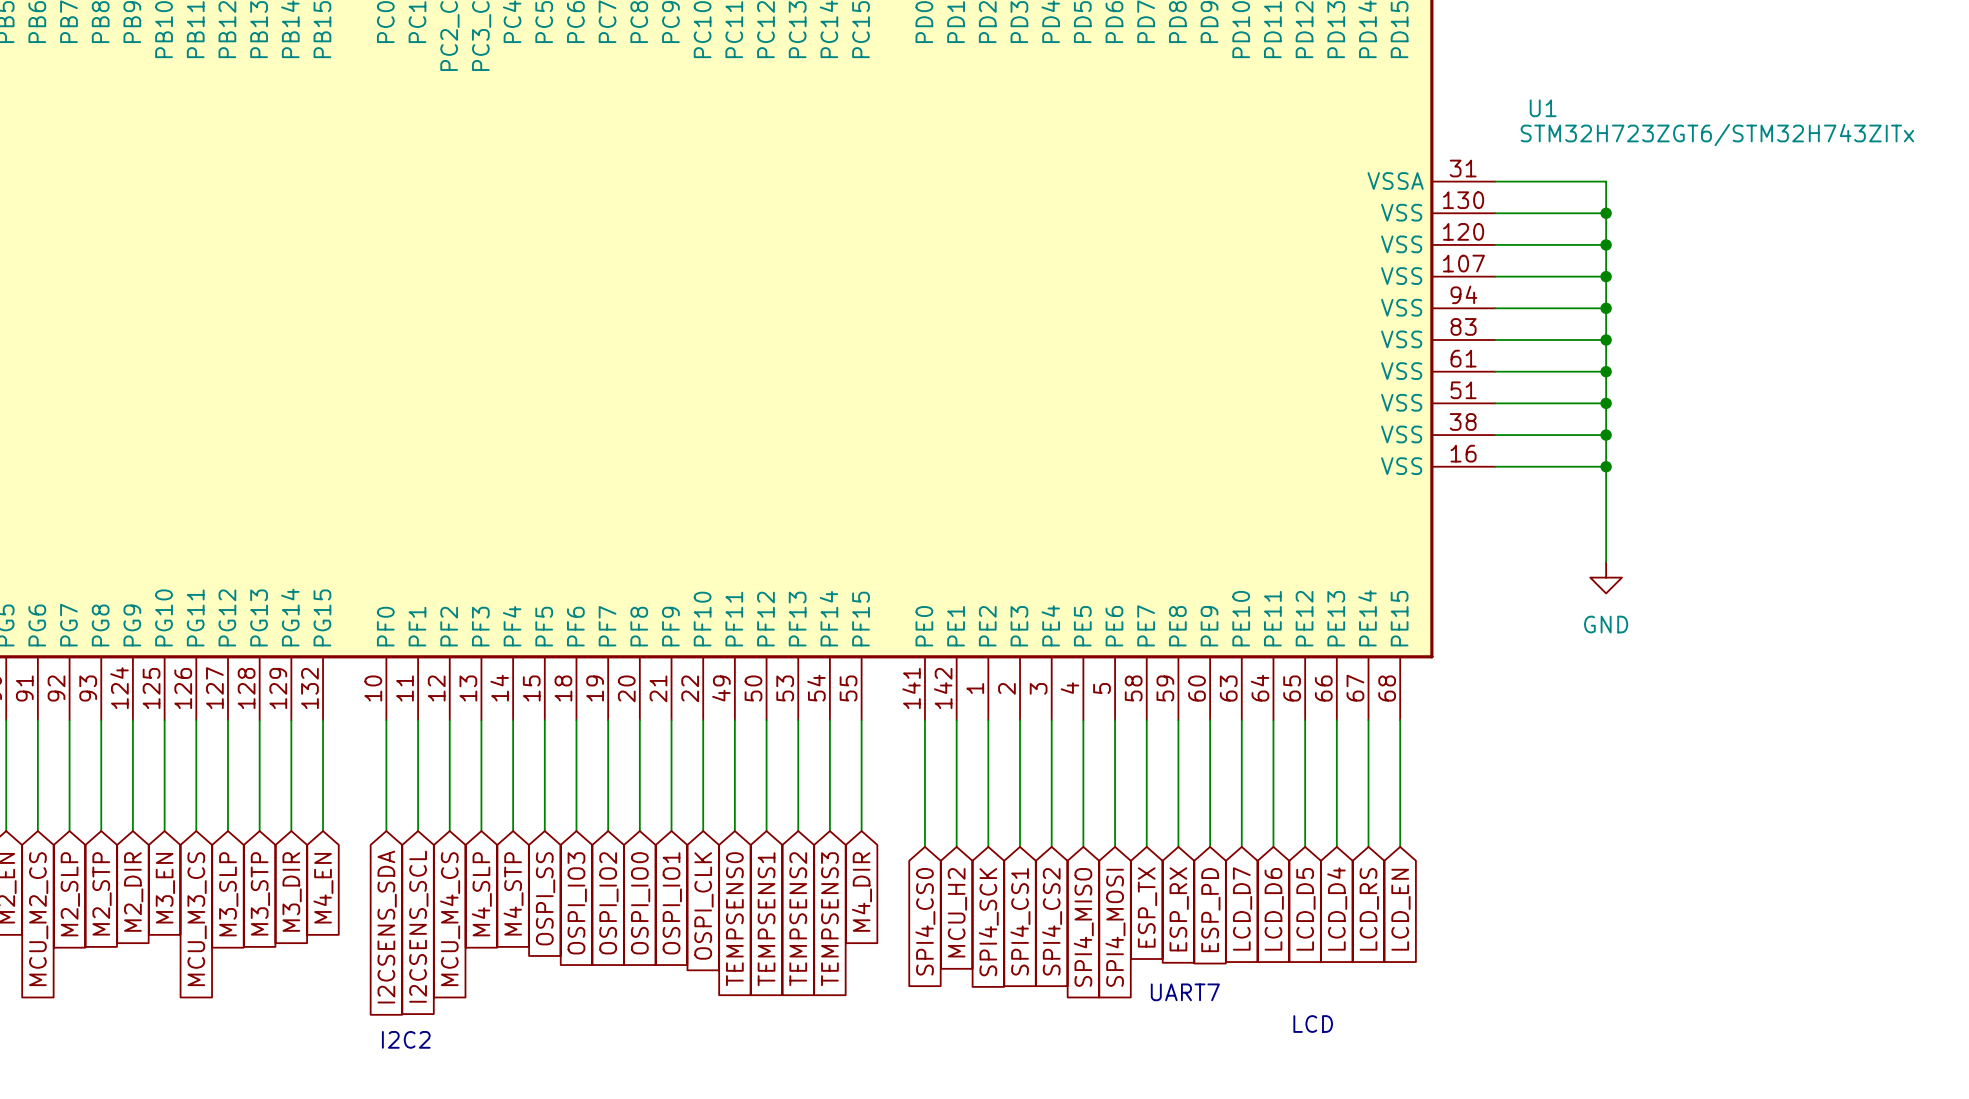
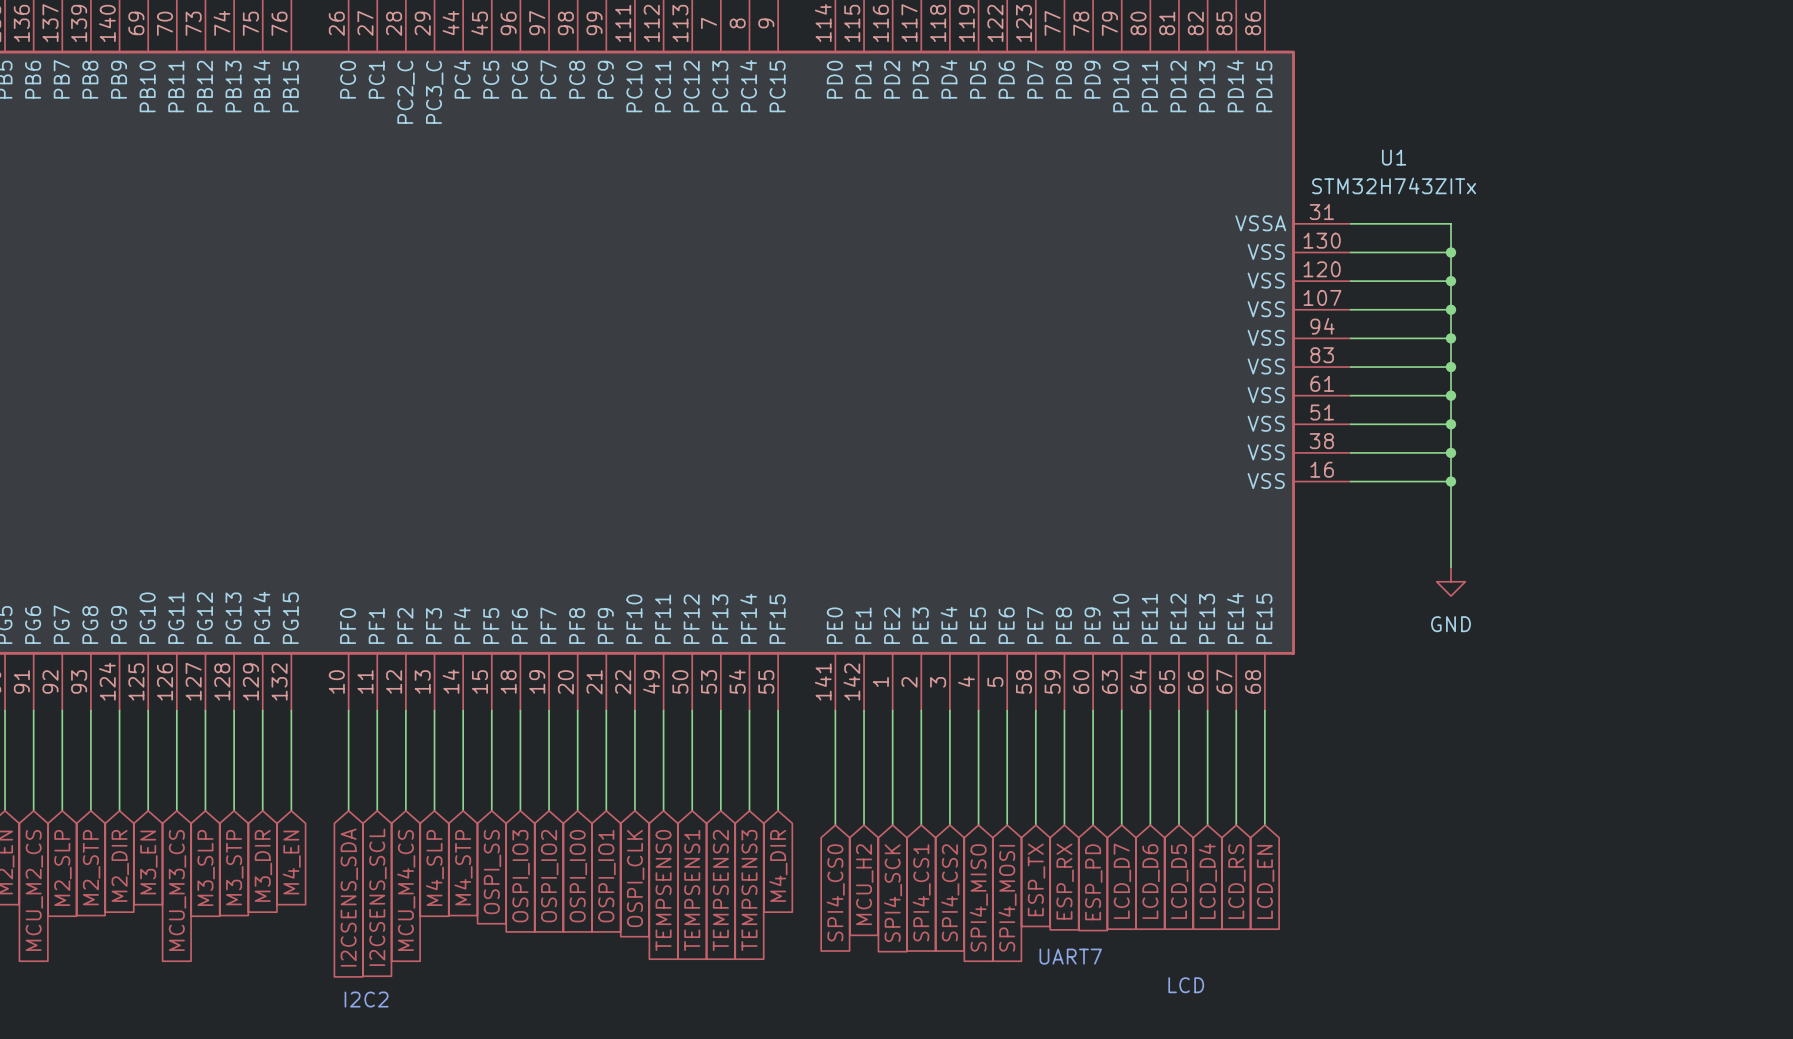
U1 value: STM32H723ZGT6/STM32H743ZITx (1717, 134) -> STM32H743ZITx (1394, 185)

